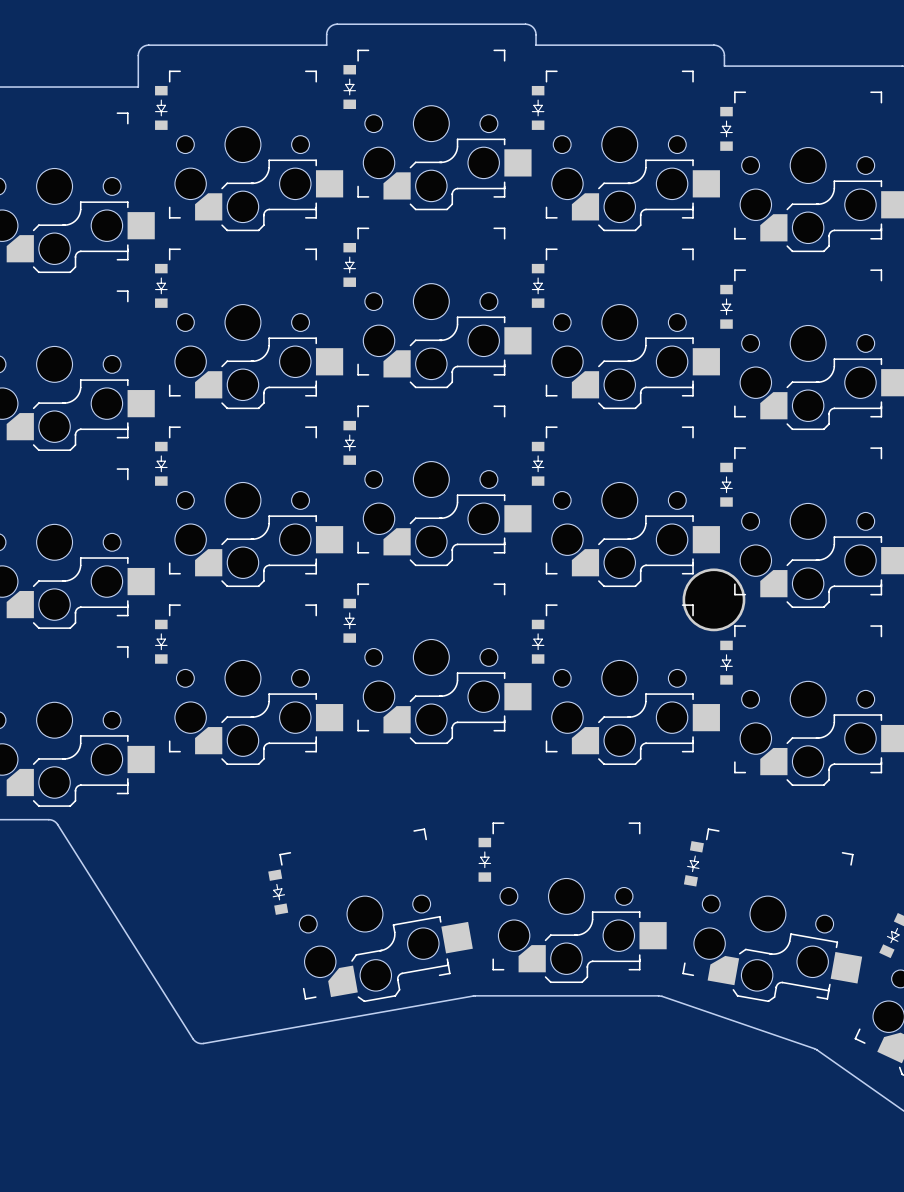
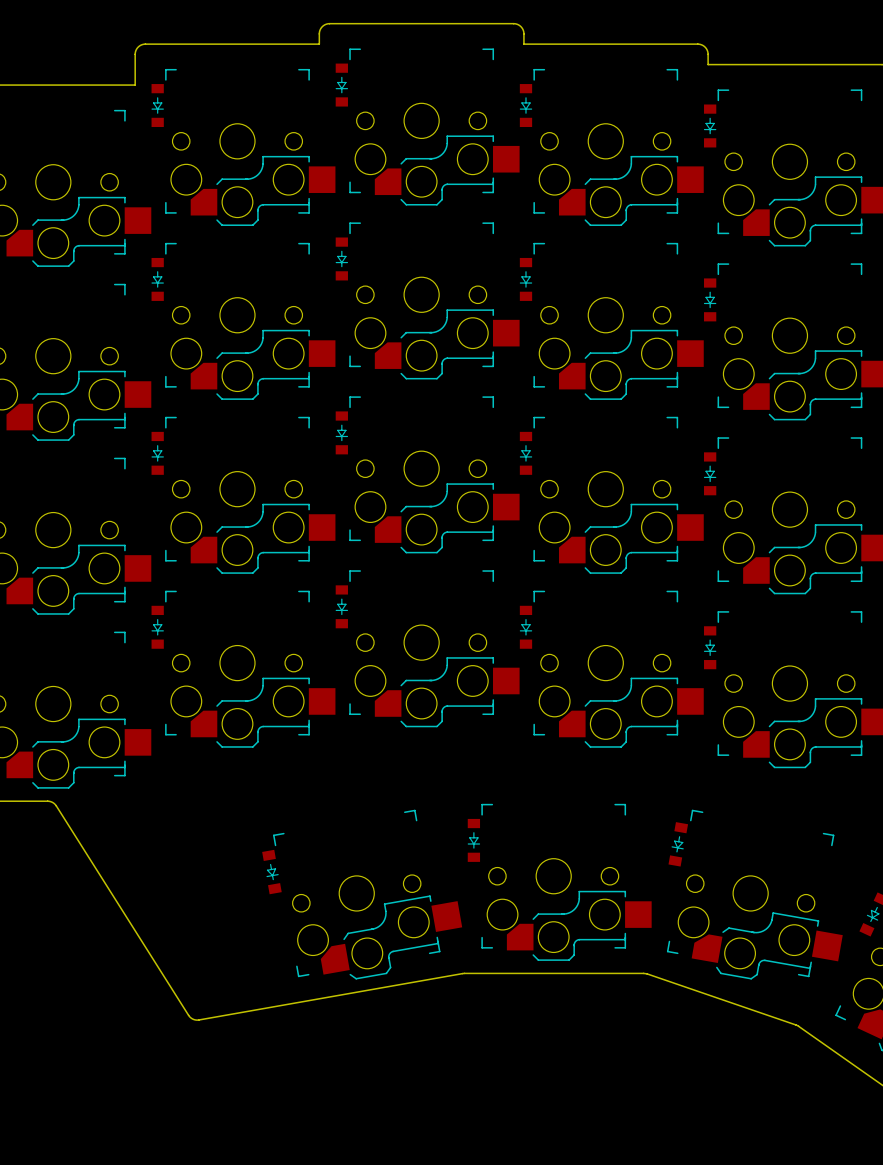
part: (713, 599) -> none

